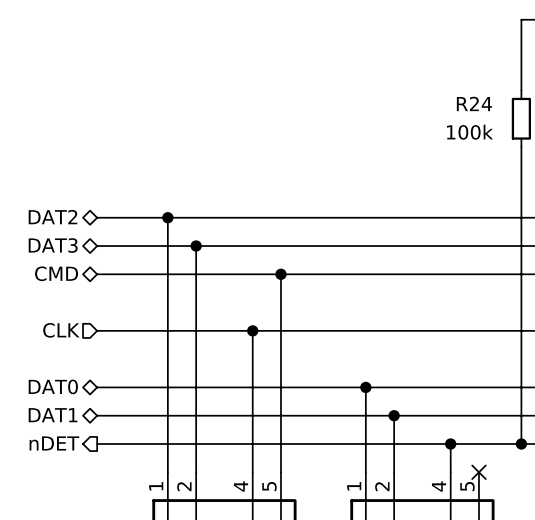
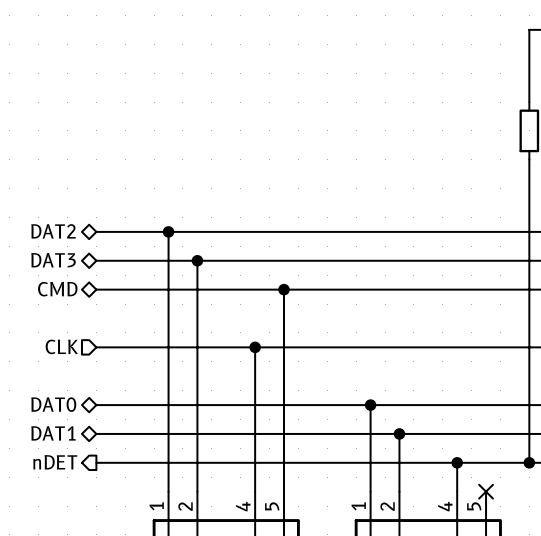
R24 name: R24 (474, 103) -> none
R24 value: 100k (470, 132) -> none

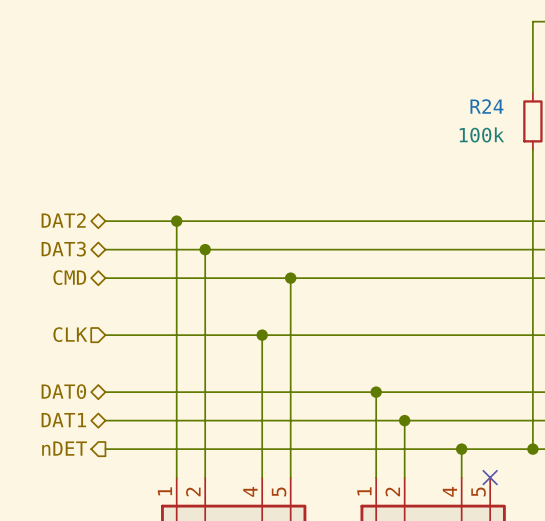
R24 name: none -> R24 (486, 106)
R24 value: none -> 100k (481, 134)

